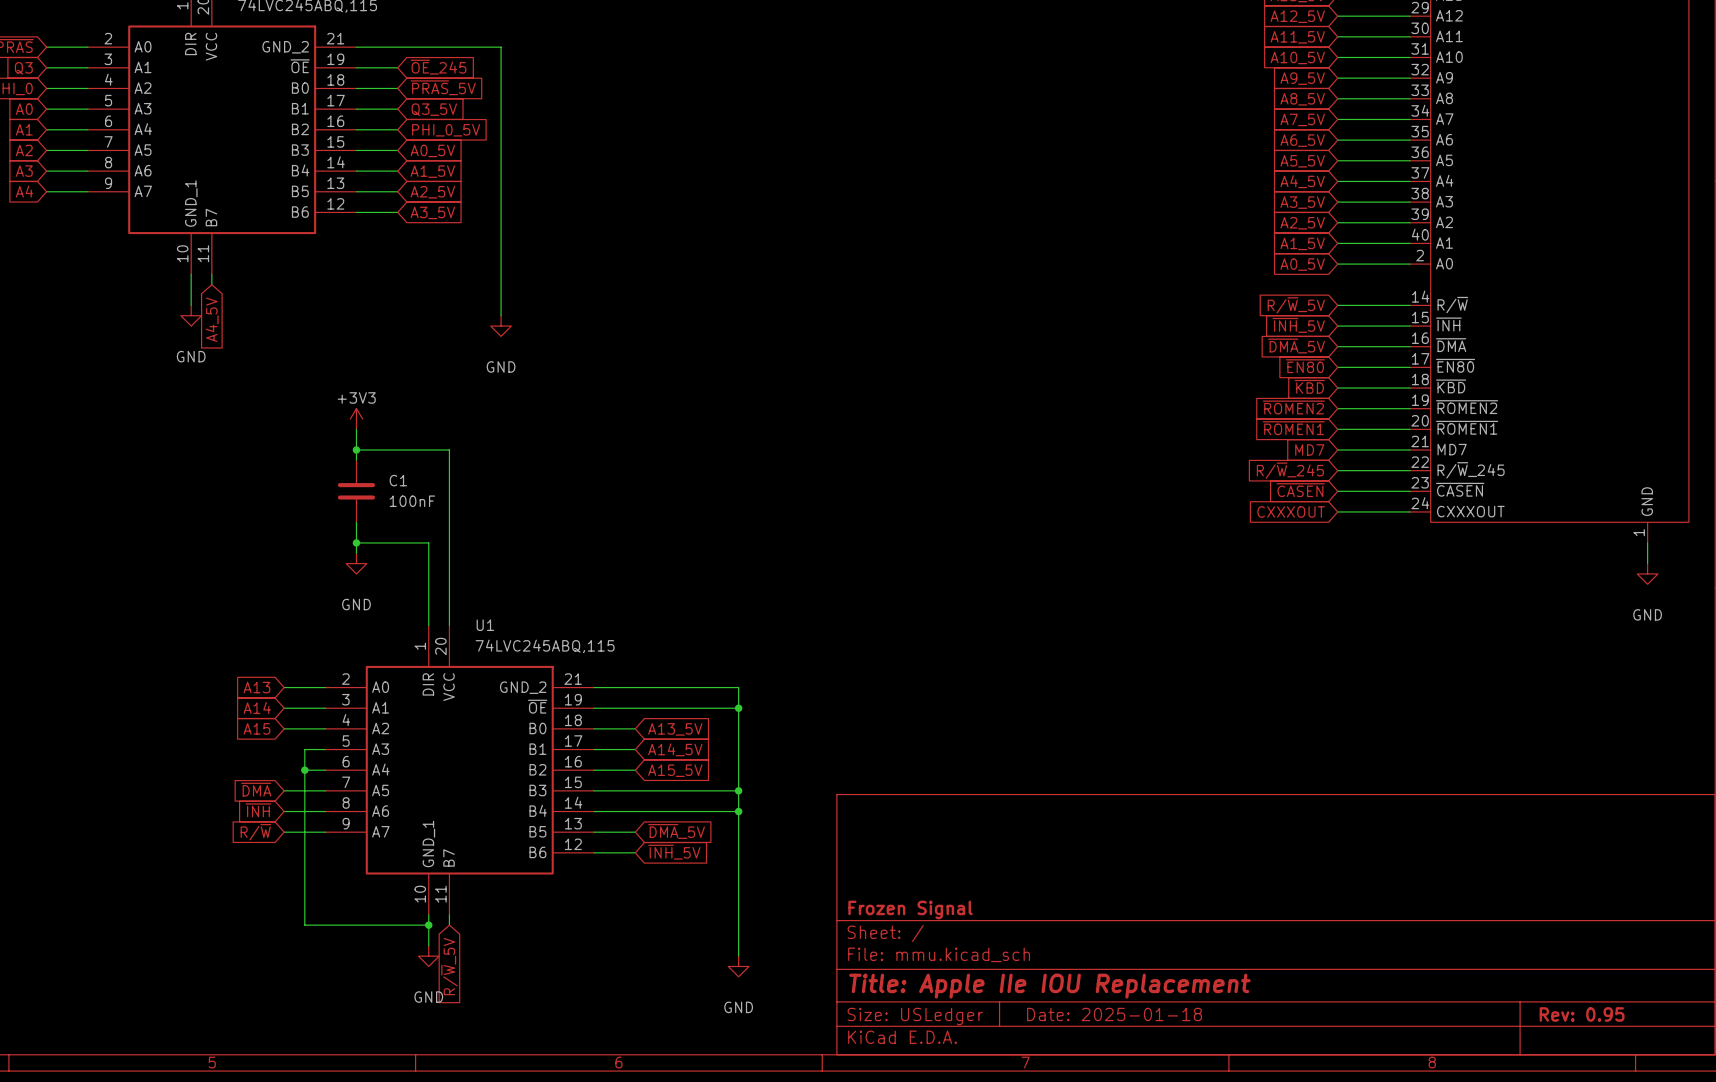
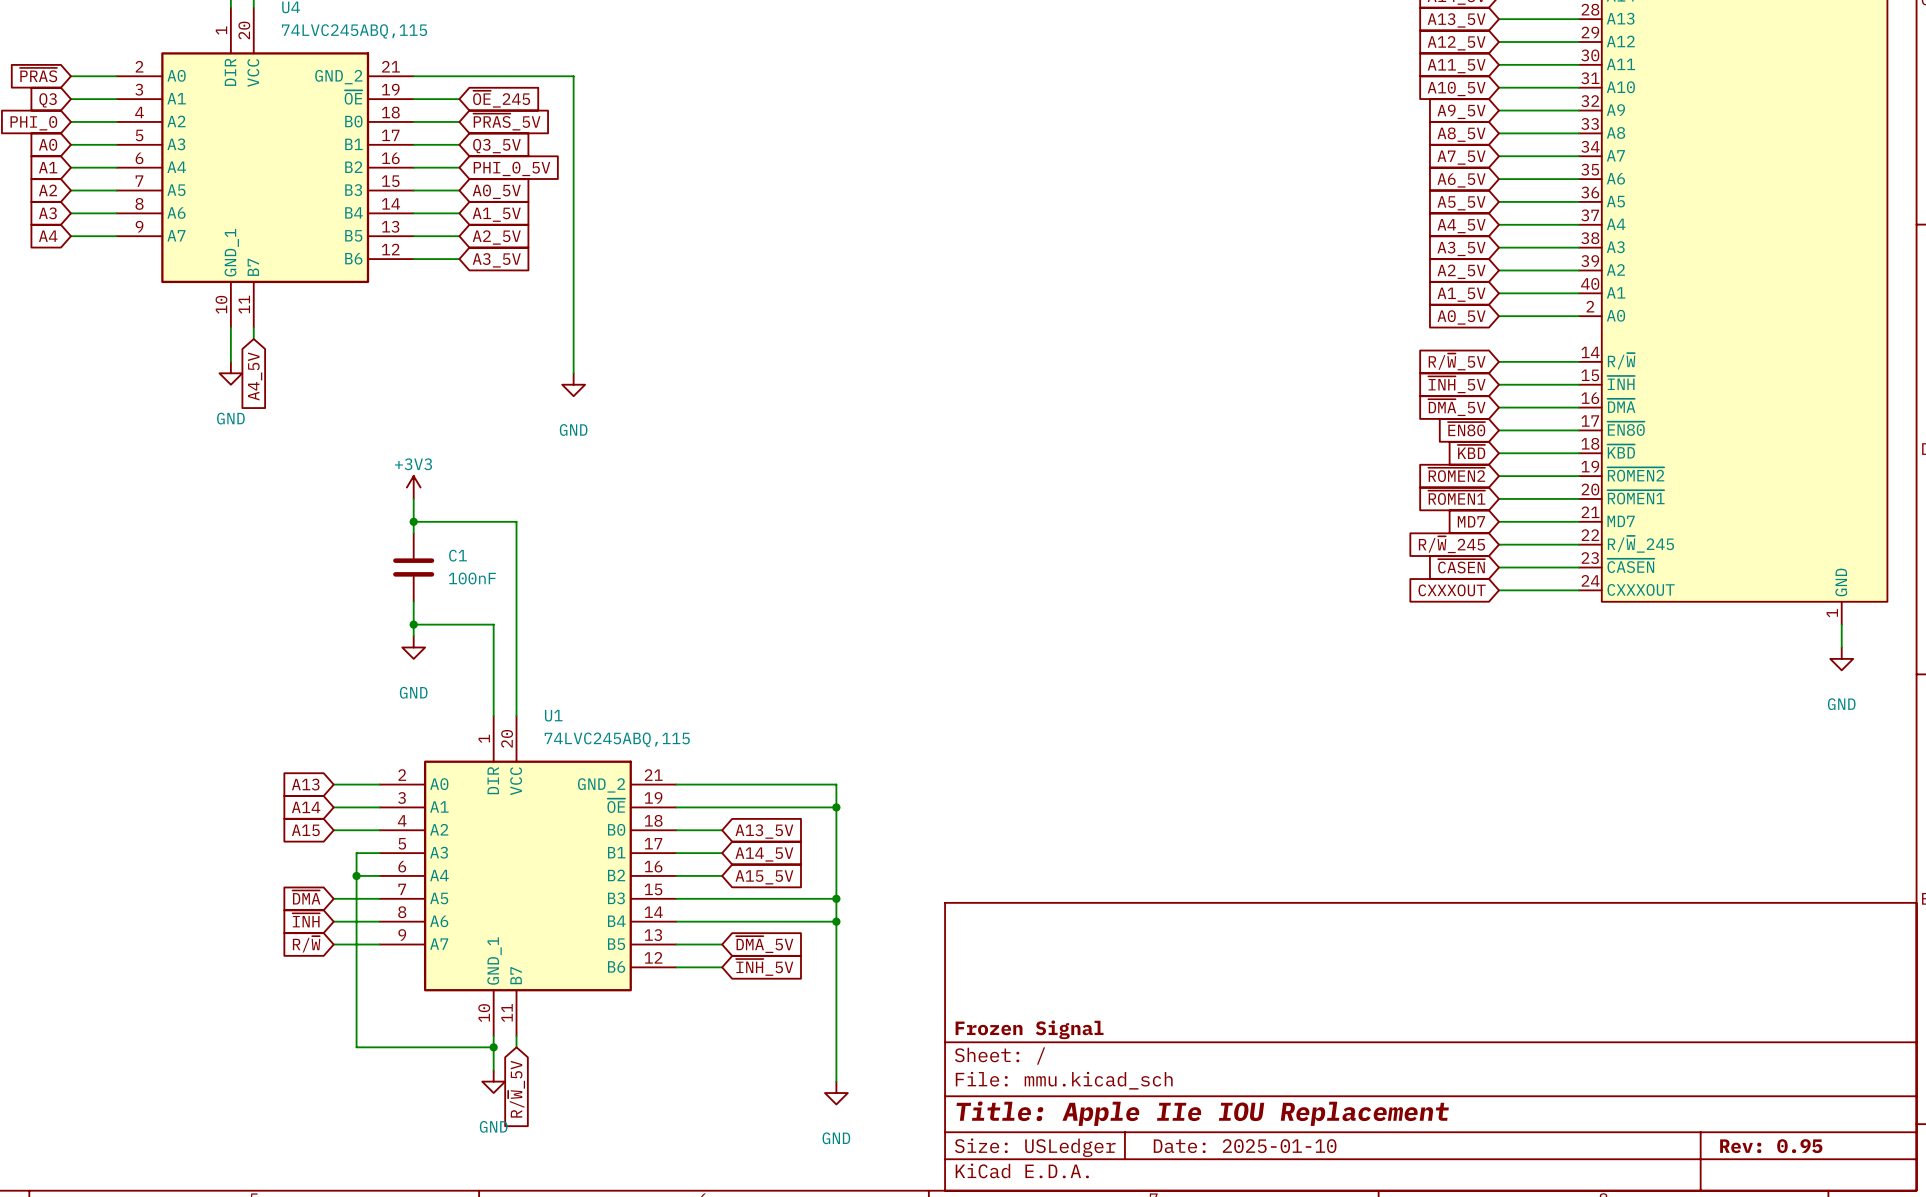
title block: Date: 2025-01-18 (1114, 1014) -> Date: 2025-01-10 (1245, 1146)

